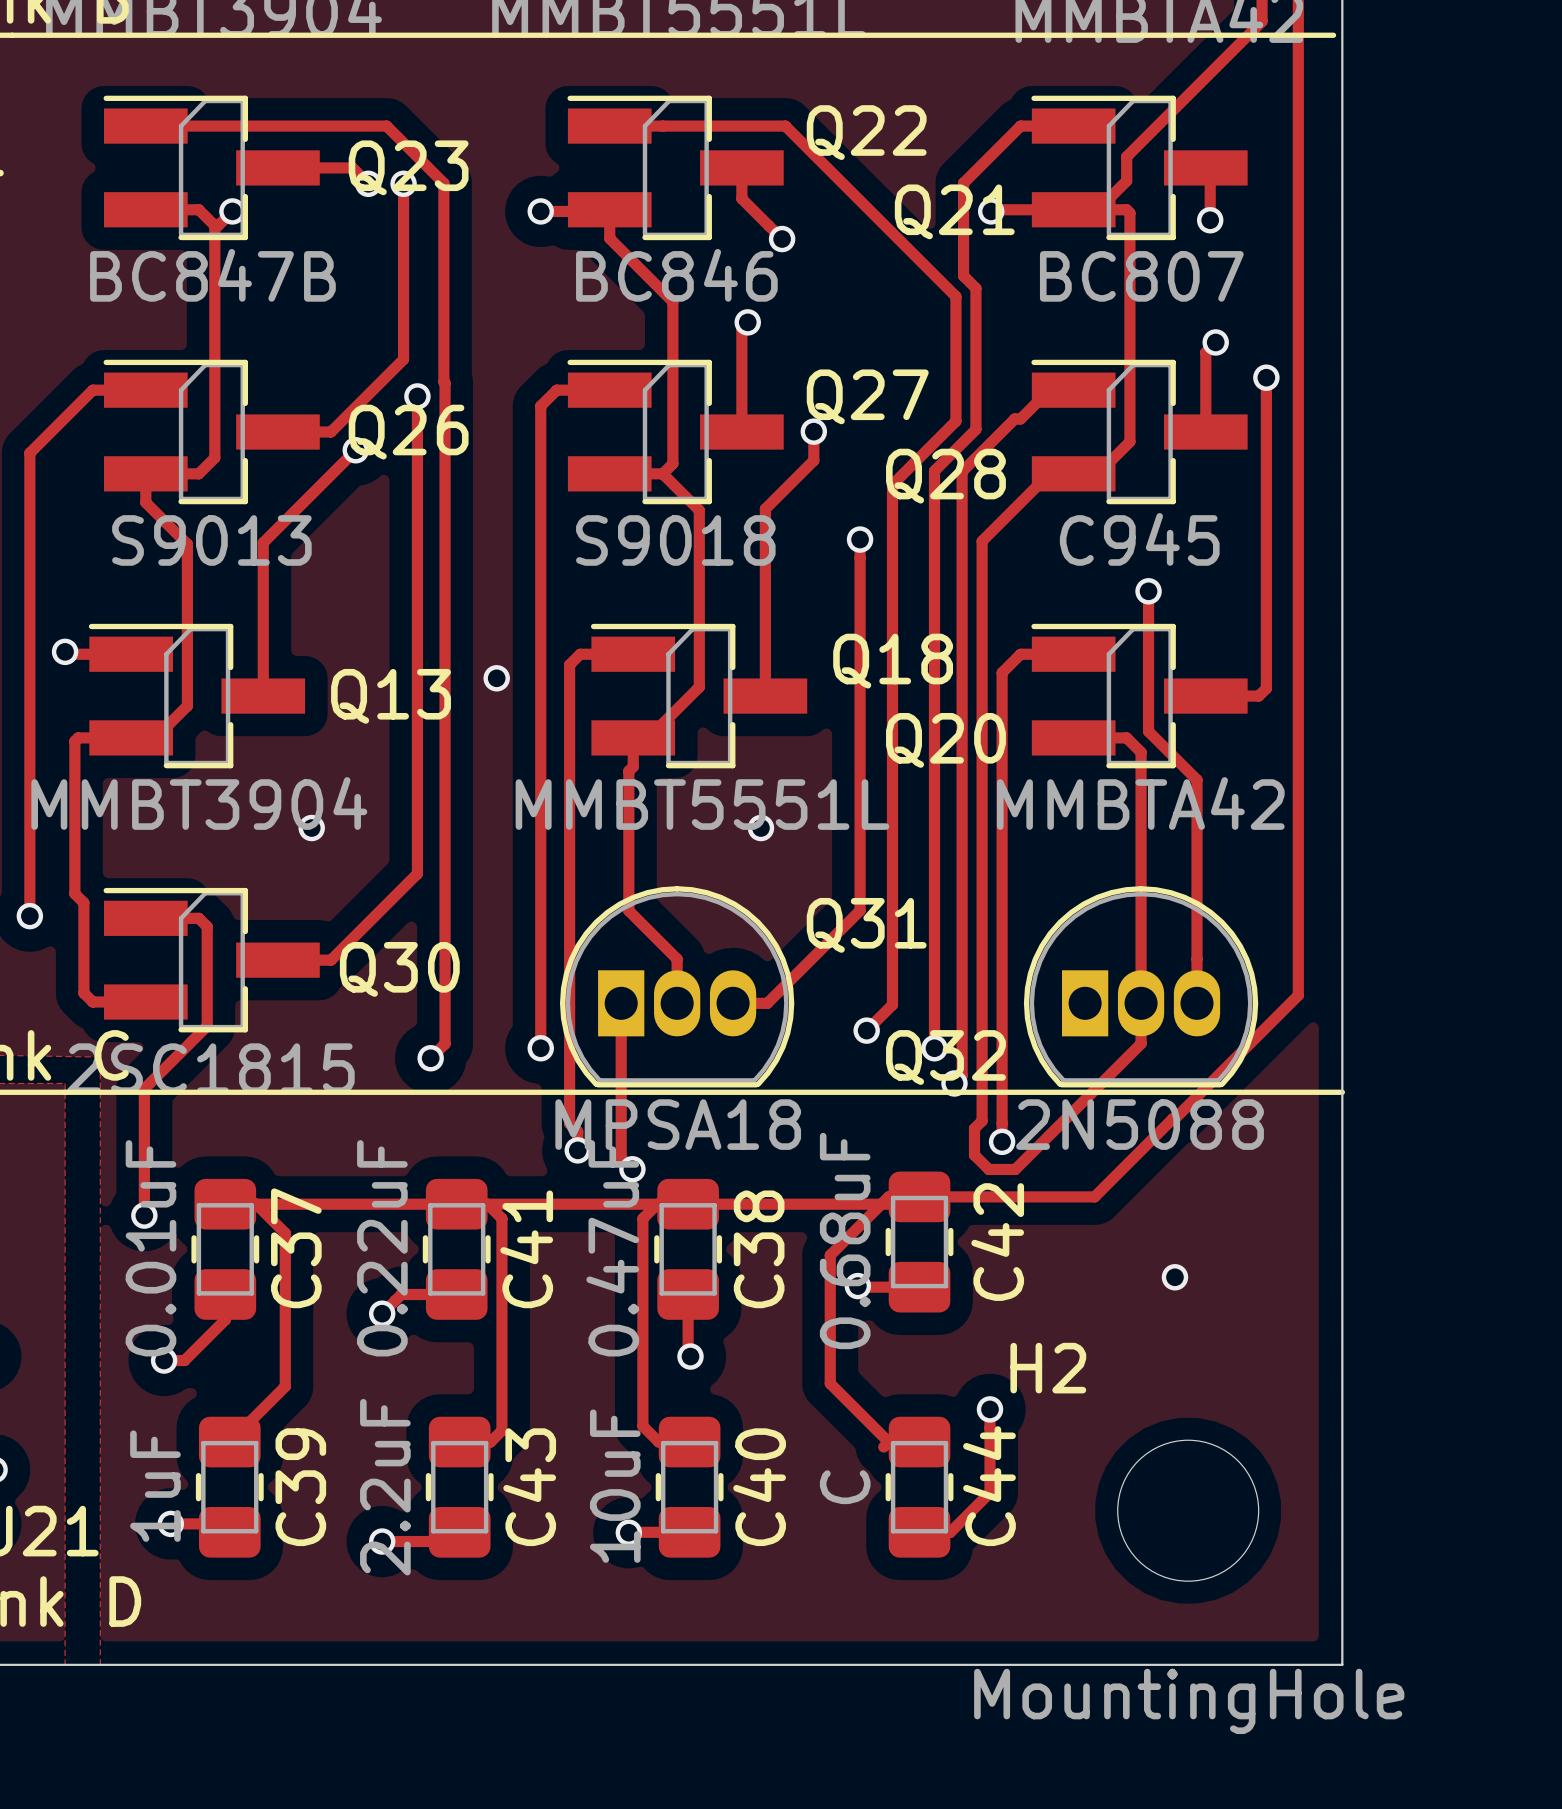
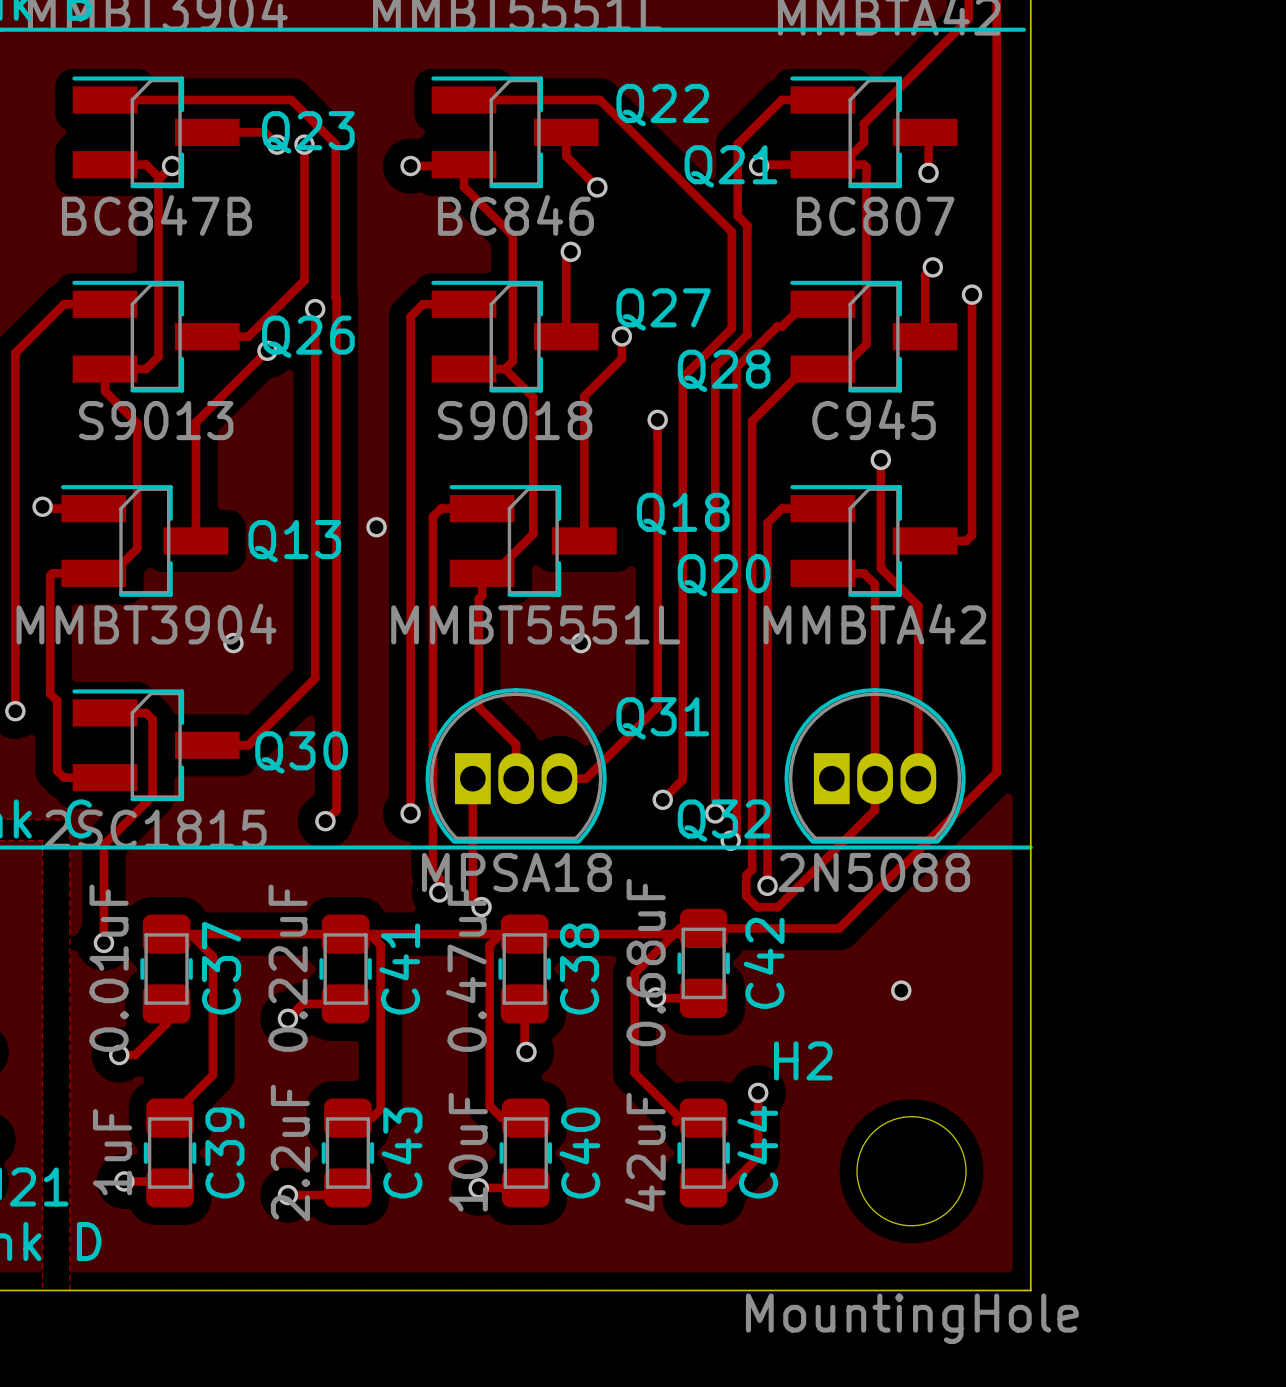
C44 value: C (845, 1487) -> 42uF (645, 1152)

